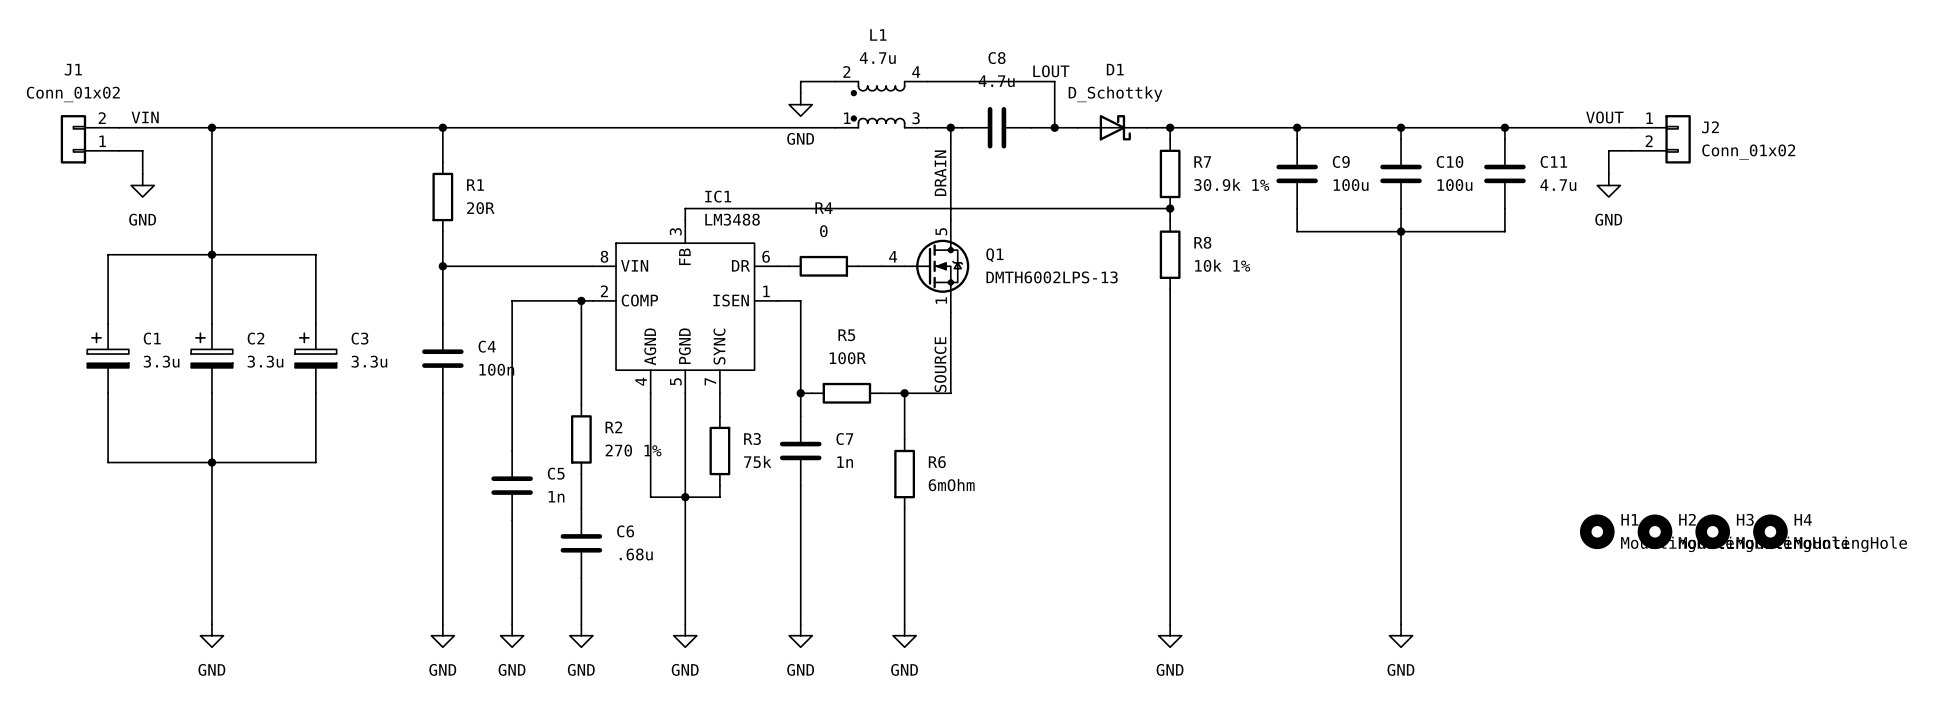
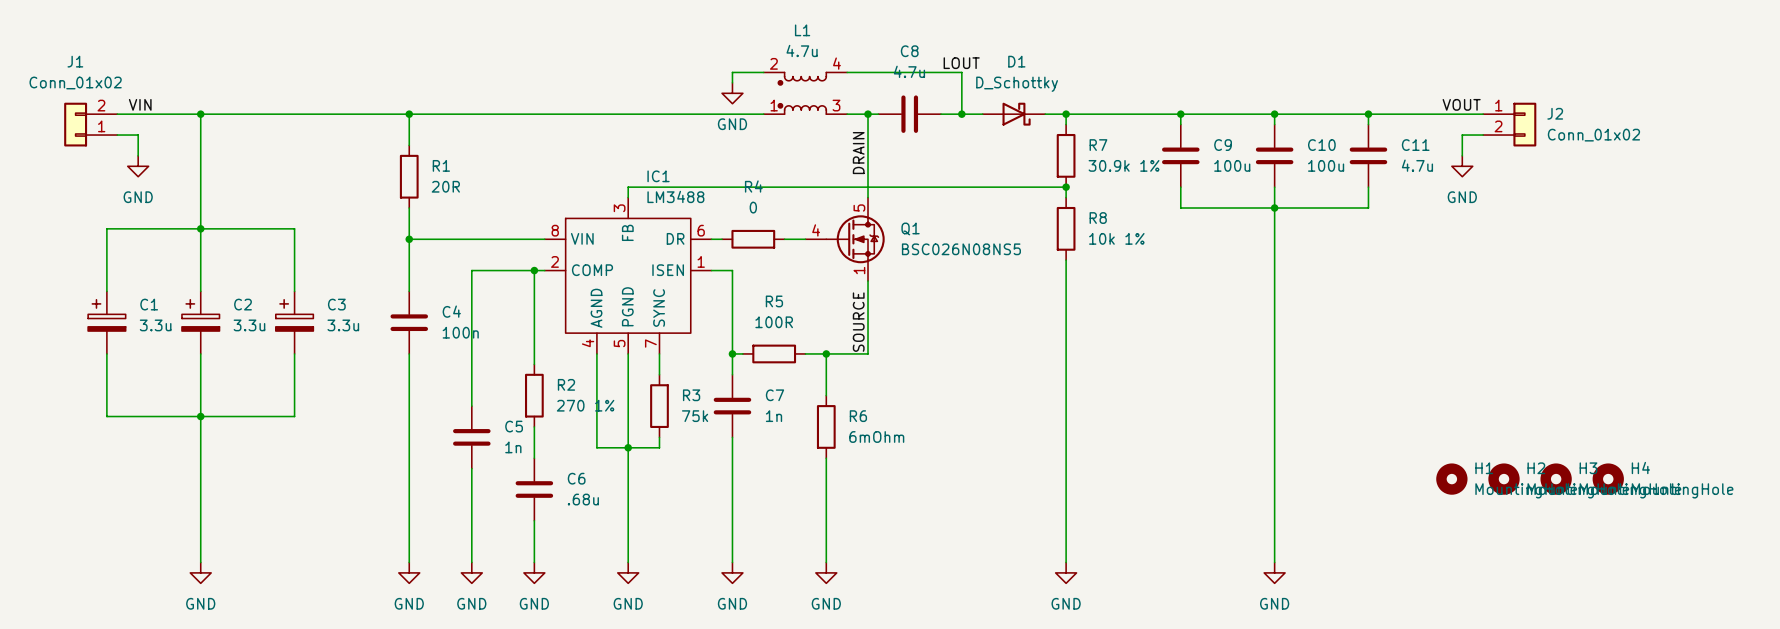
Q1 value: DMTH6002LPS-13 (1052, 277) -> BSC026N08NS5 (961, 249)

